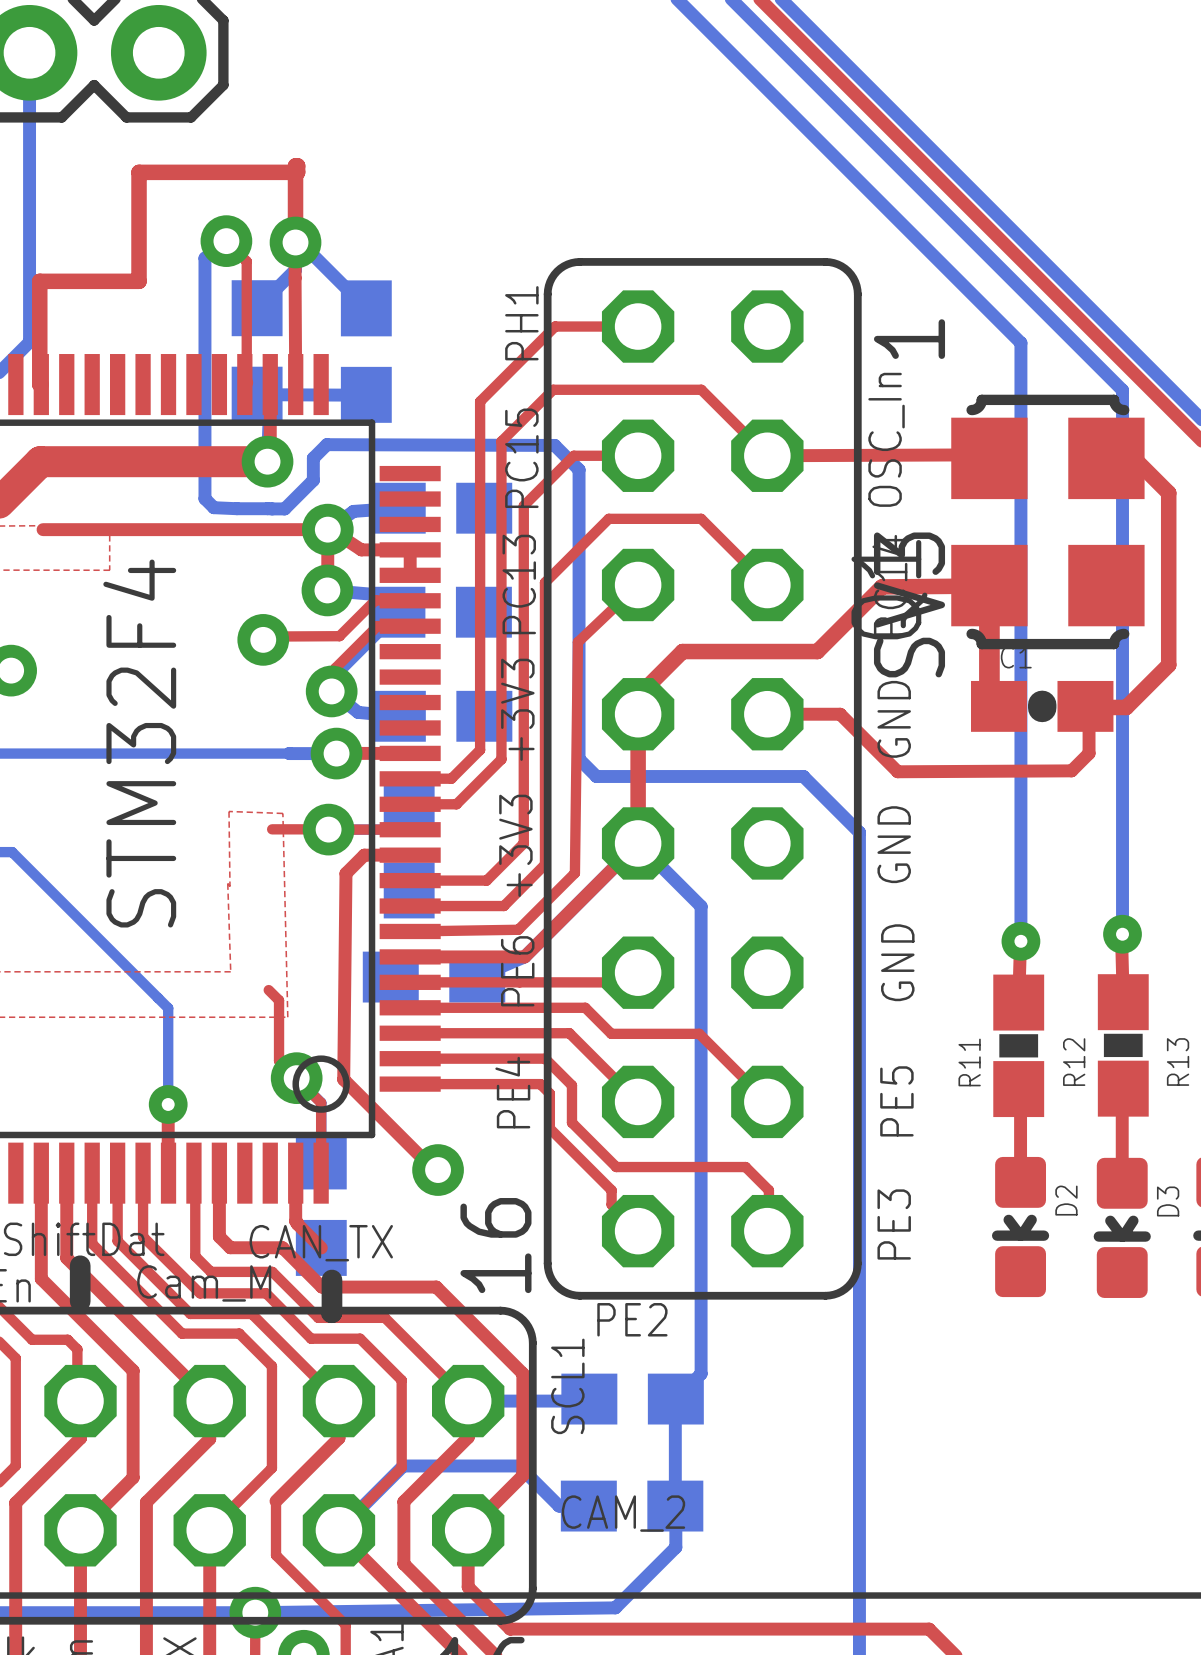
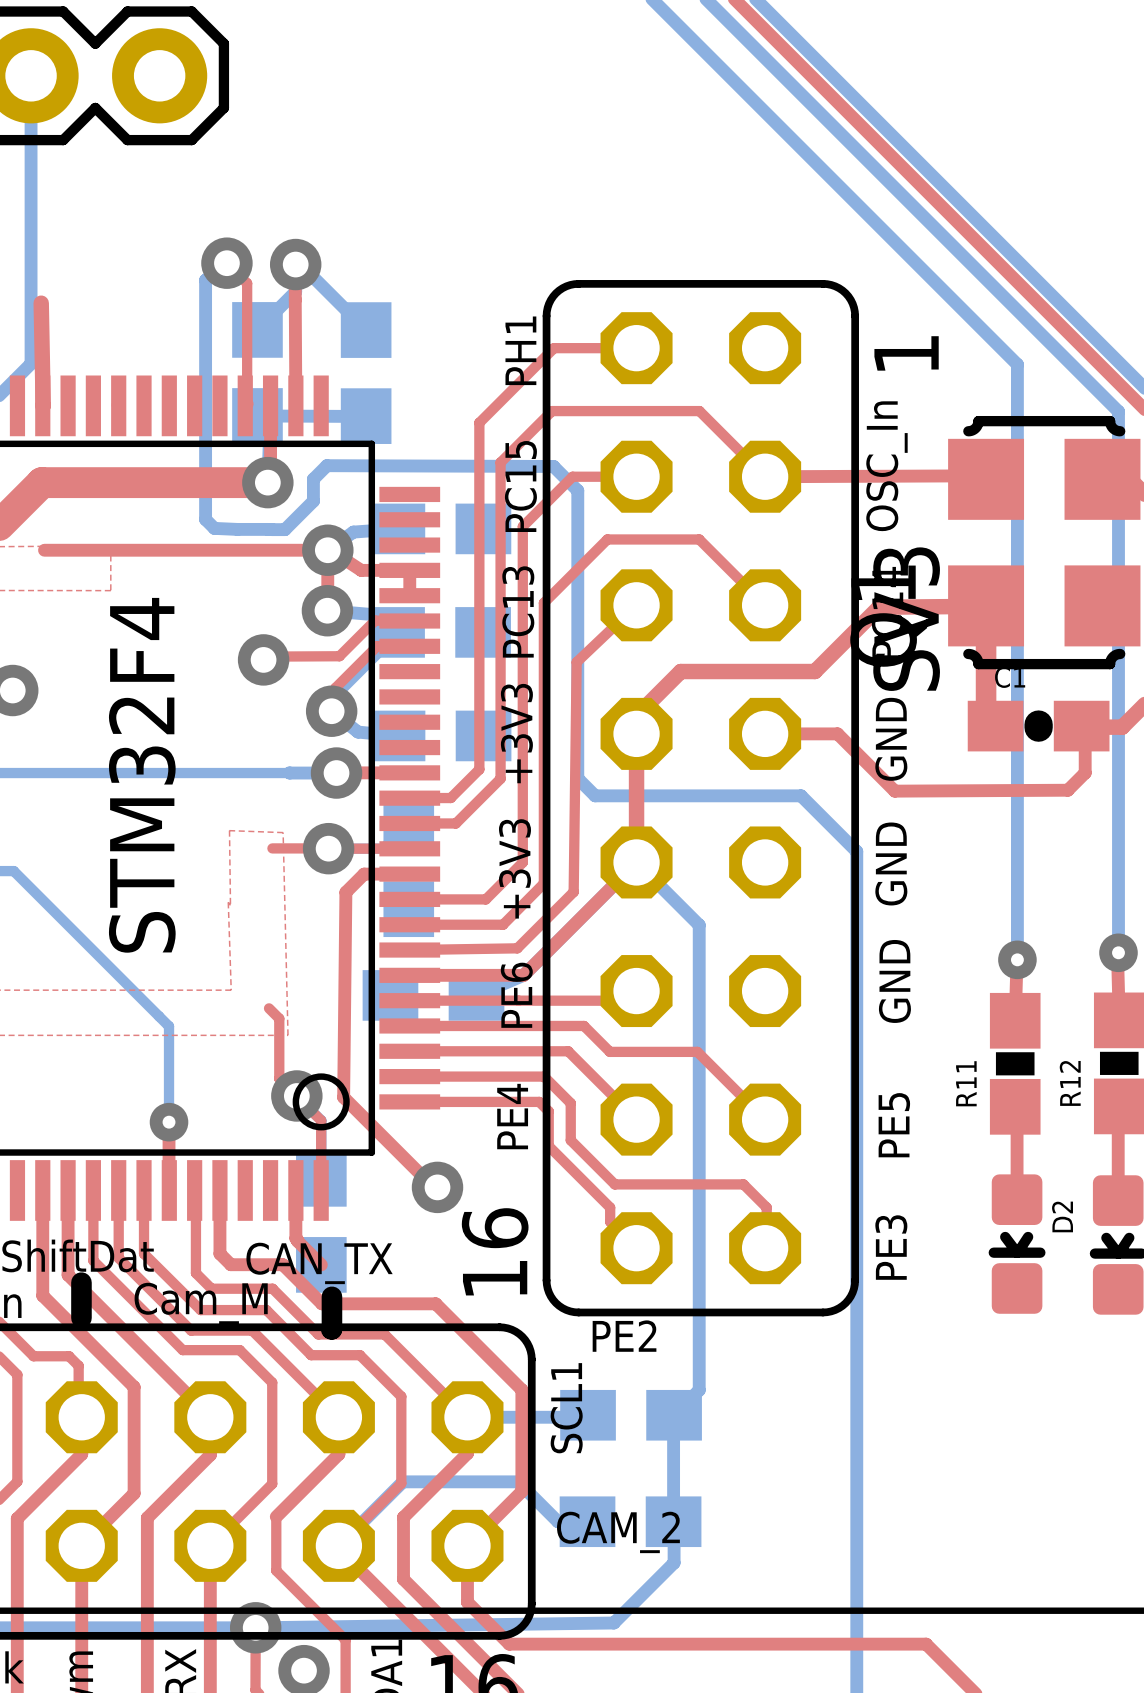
top track: (295, 242) (295, 165) (297, 165) (297, 172) (139, 172) (139, 281) (39, 281) (39, 384) (41, 384) -> (41, 303) (43, 405)

